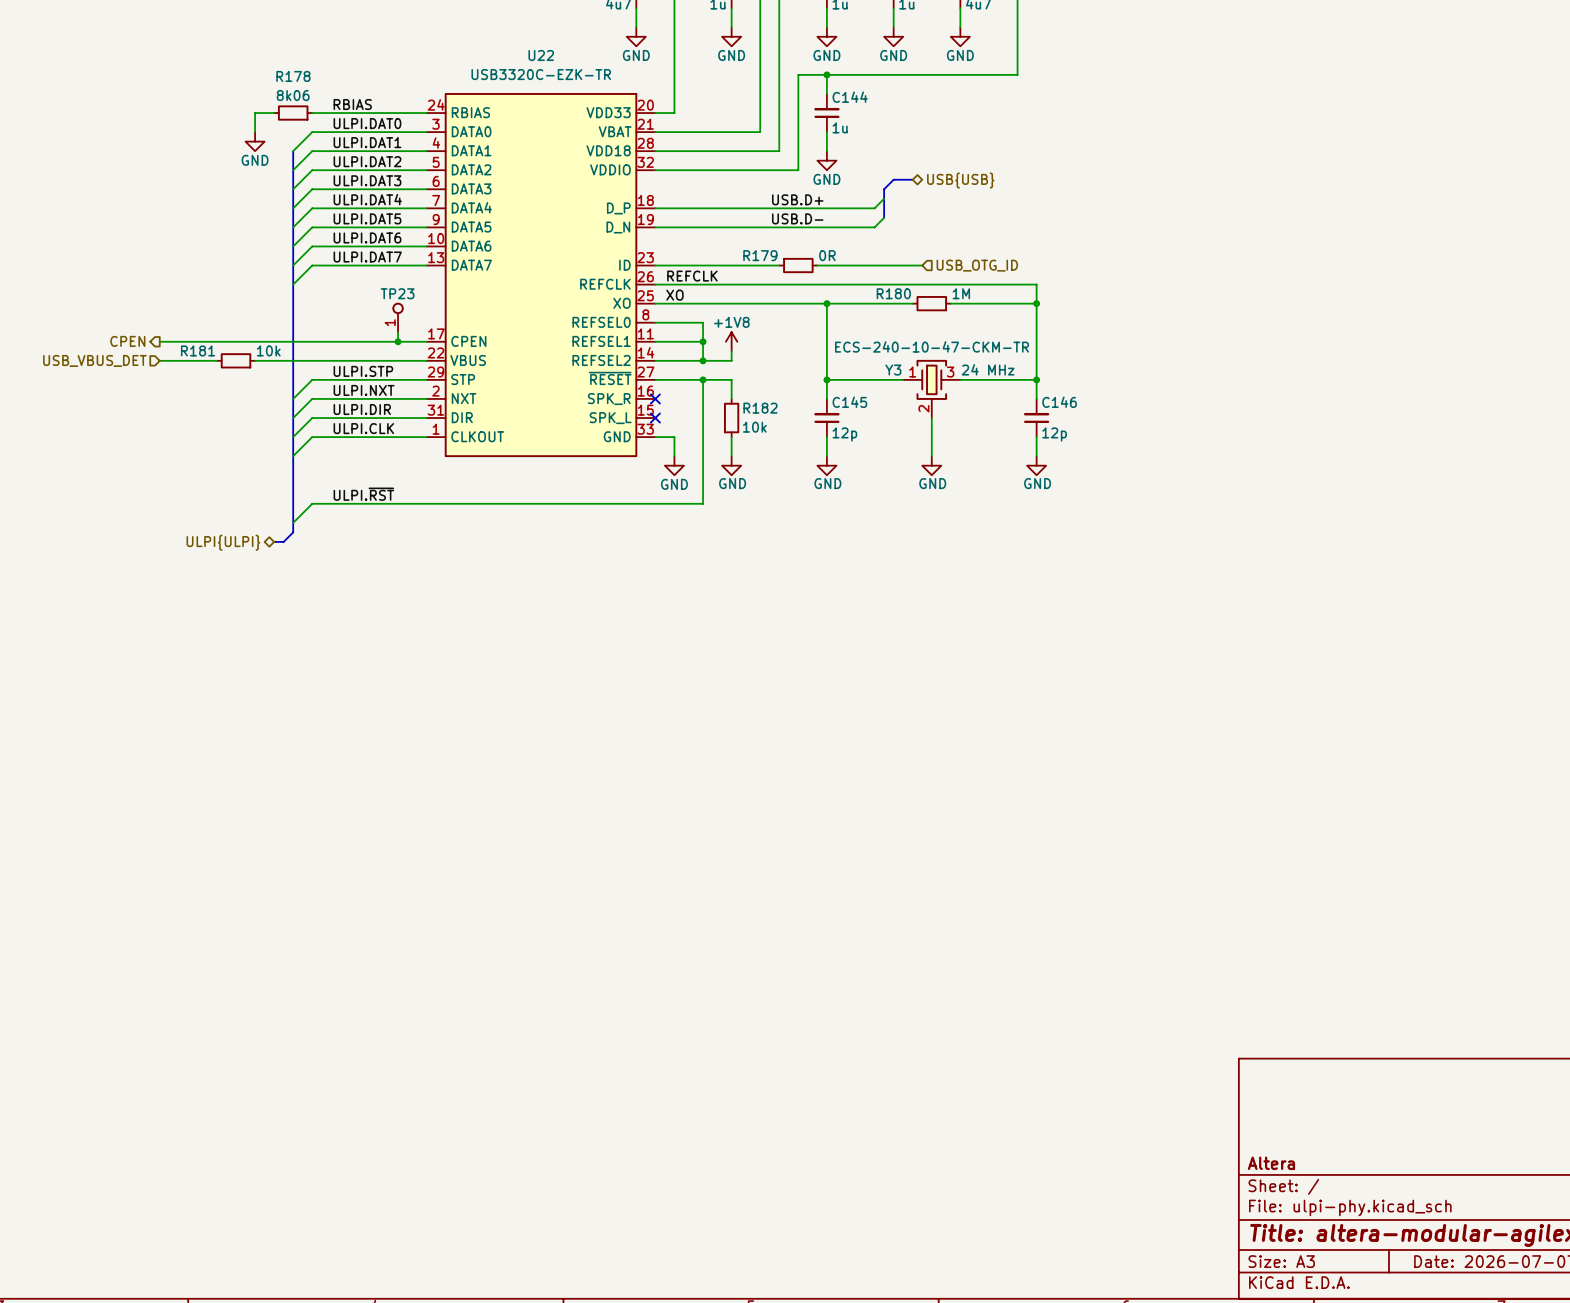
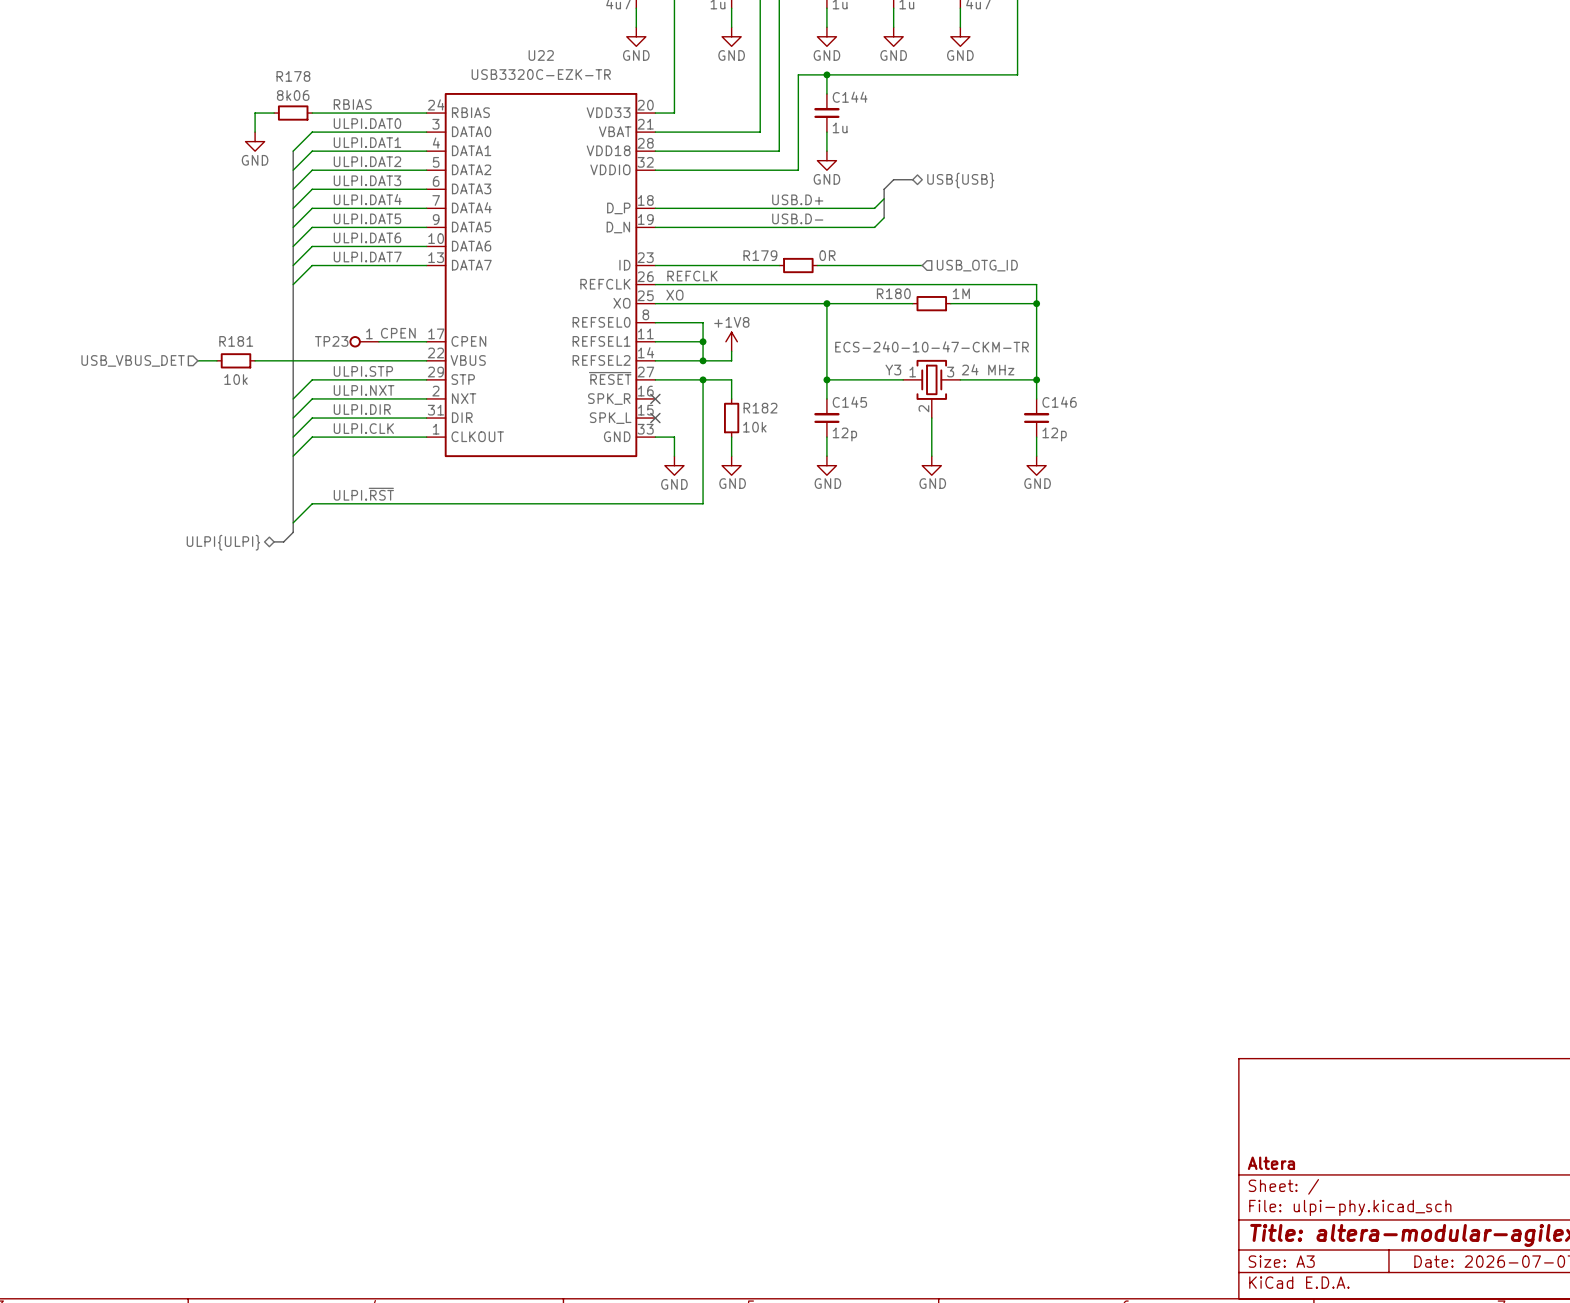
TP23 rotation: 0° (398, 308) -> 90° counterclockwise (355, 341)
TP23 position: (398, 317) -> (364, 341)
wire: (398, 332) (398, 341) -> none
label: none -> CPEN (398, 333)
hierarchical label: CPEN (127, 341) -> none
wire: (159, 341) (378, 341) -> none
junction: (398, 341) -> none
R181 name position: R181 (198, 350) -> R181 (236, 341)
R181 text position: 10k (268, 350) -> 10k (236, 379)
hierarchical label position: USB_VBUS_DET (94, 360) -> USB_VBUS_DET (133, 360)
wire: (159, 360) (197, 360) -> none

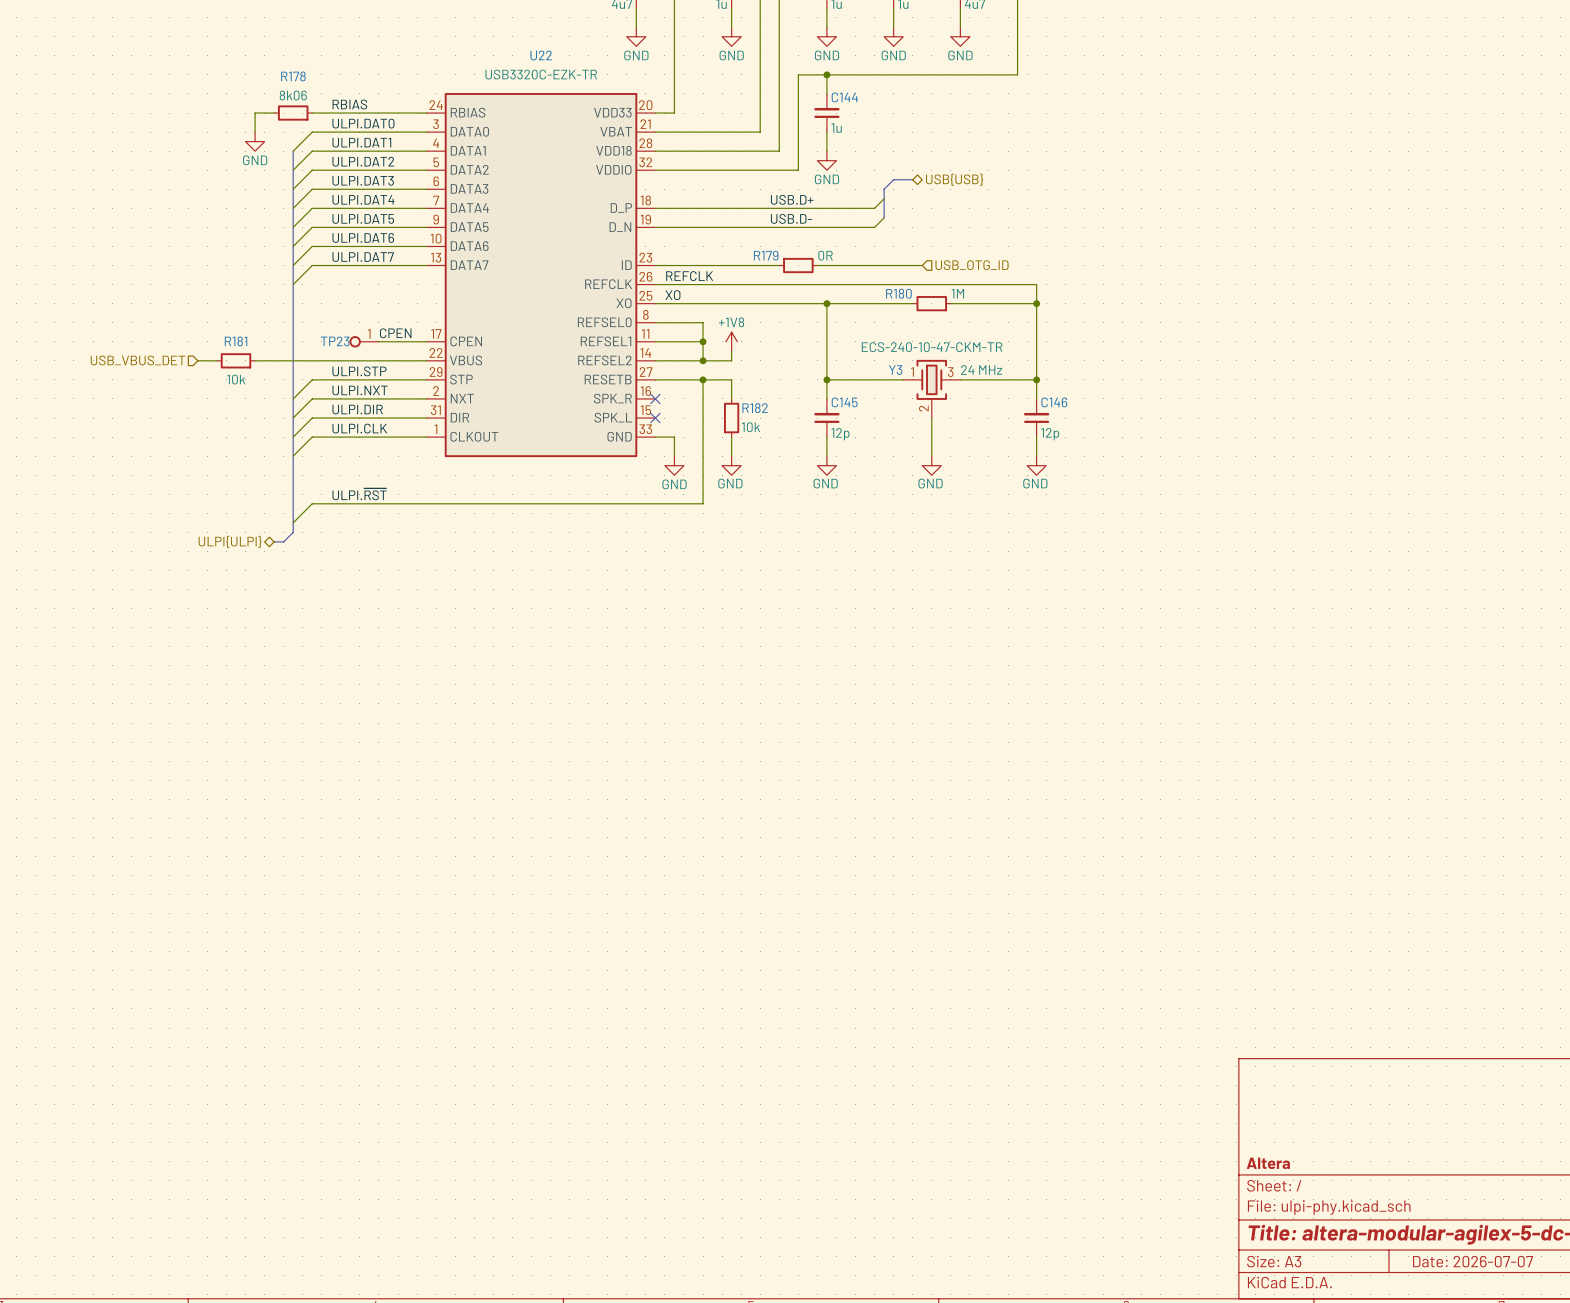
U22 pin name: ~{RESET} (610, 378) -> RESETB (608, 379)

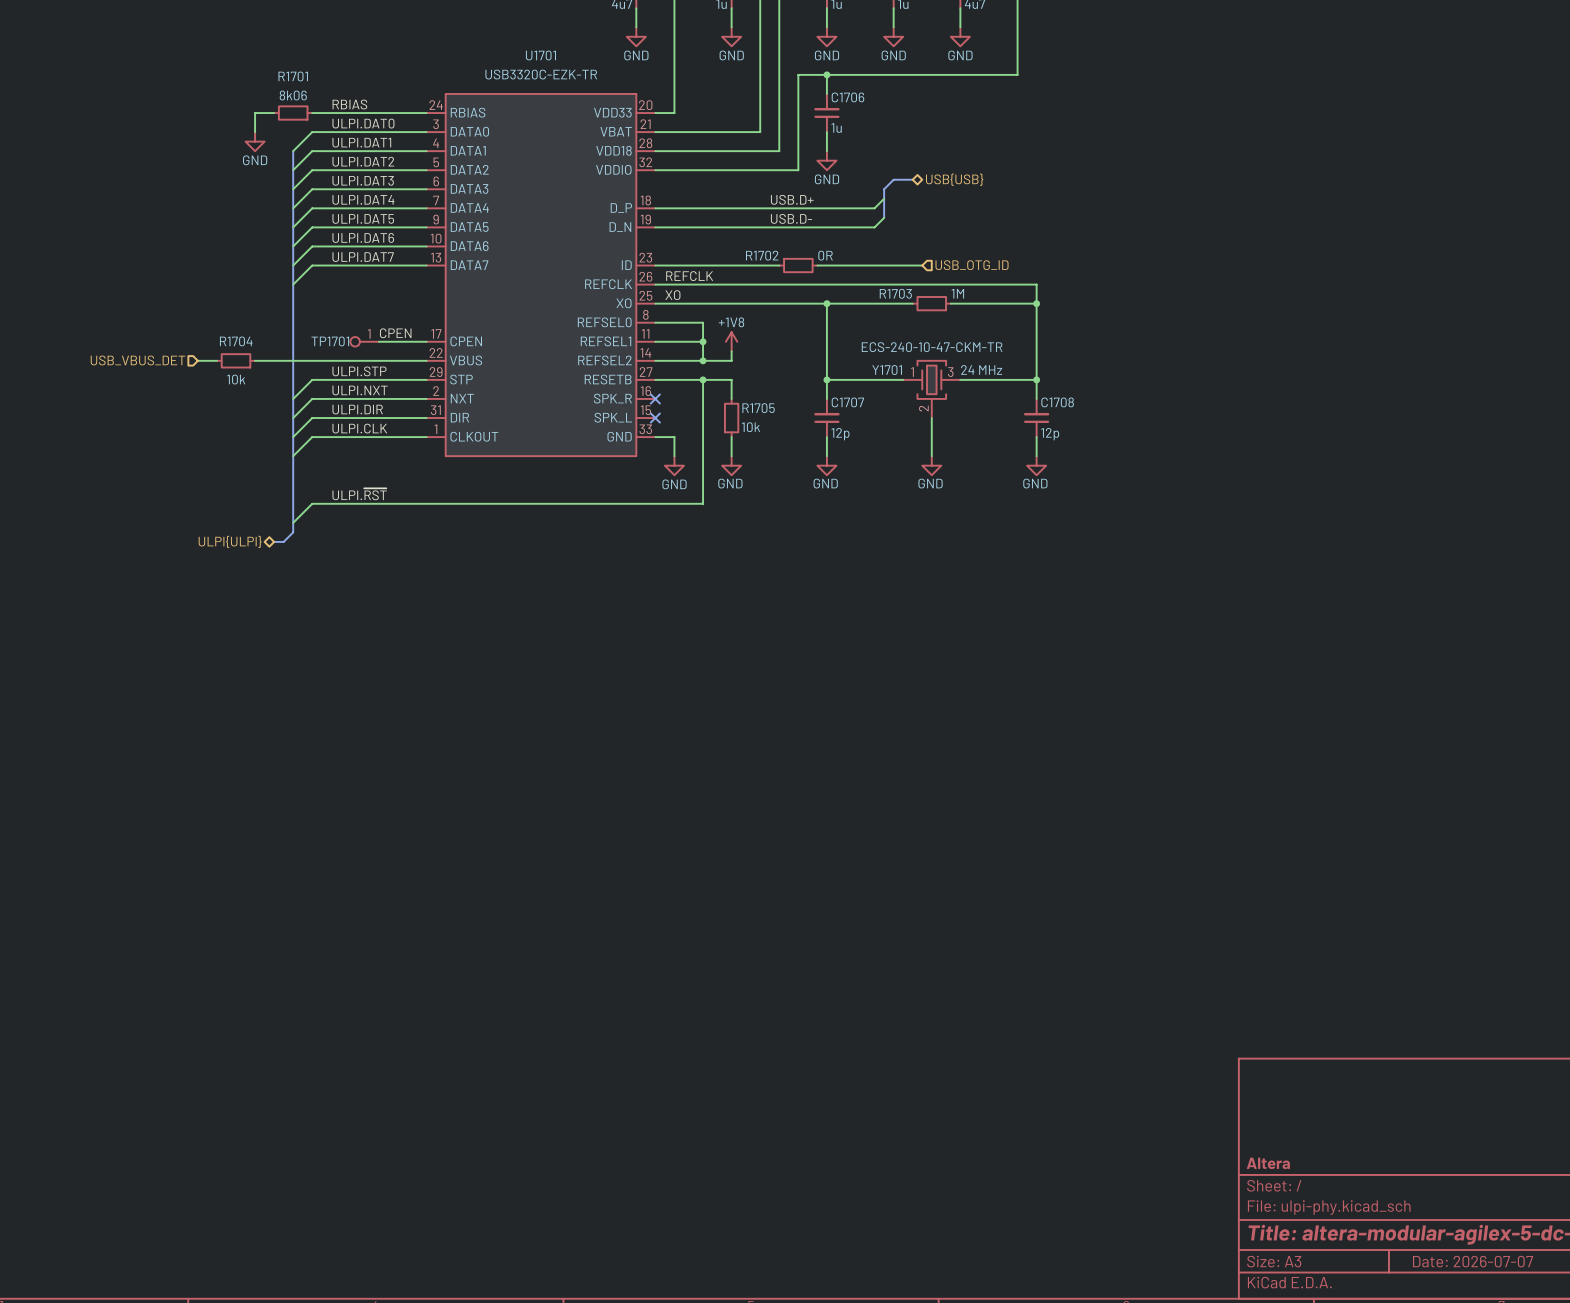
U22 name: U22 (541, 55) -> U1701 (540, 55)
R178 name: R178 (293, 76) -> R1701 (293, 76)
C144 name: C144 (844, 97) -> C1706 (847, 97)
R179 name: R179 (766, 255) -> R1702 (762, 255)
R180 name: R180 (898, 293) -> R1703 (895, 293)
R181 name: R181 (236, 341) -> R1704 (236, 341)
TP23 name: TP23 (335, 341) -> TP1701 (330, 341)
Y3 name: Y3 (895, 370) -> Y1701 (887, 370)
C145 name: C145 (844, 402) -> C1707 (847, 402)
C146 name: C146 (1054, 402) -> C1708 (1057, 402)
R182 name: R182 (755, 408) -> R1705 (758, 408)

